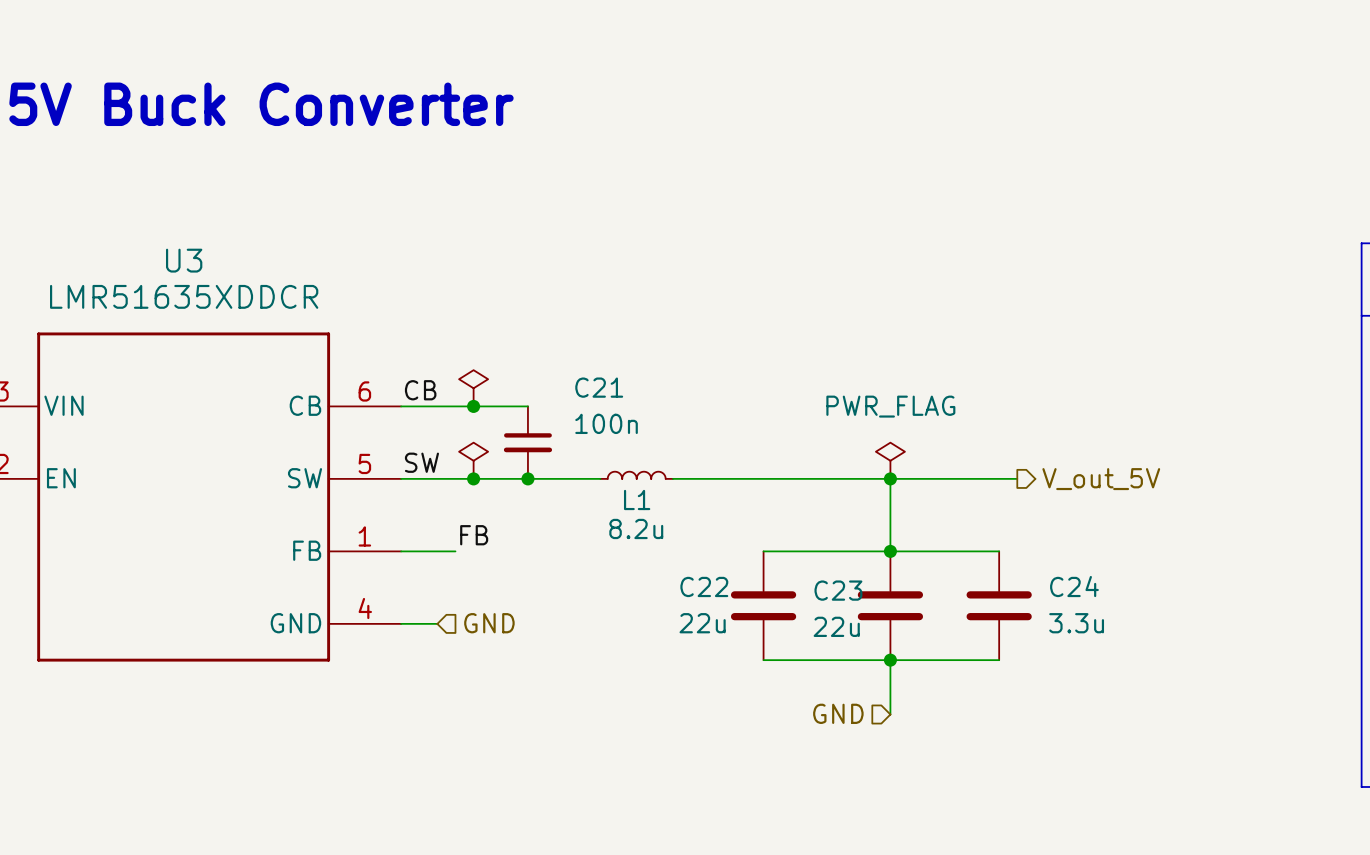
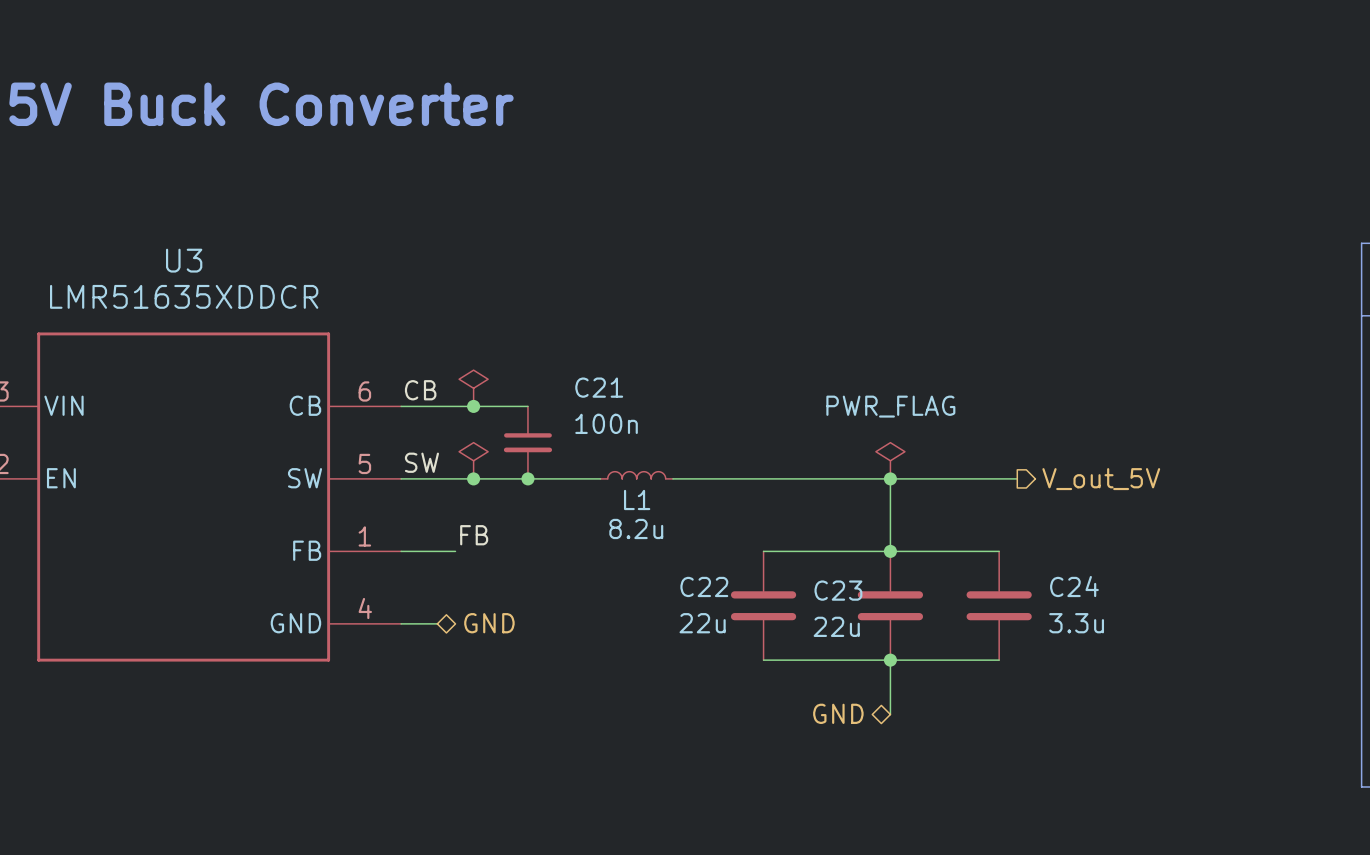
hierarchical label shape: input (489, 623) -> bidirectional (489, 623)
hierarchical label shape: input (838, 713) -> bidirectional (838, 713)

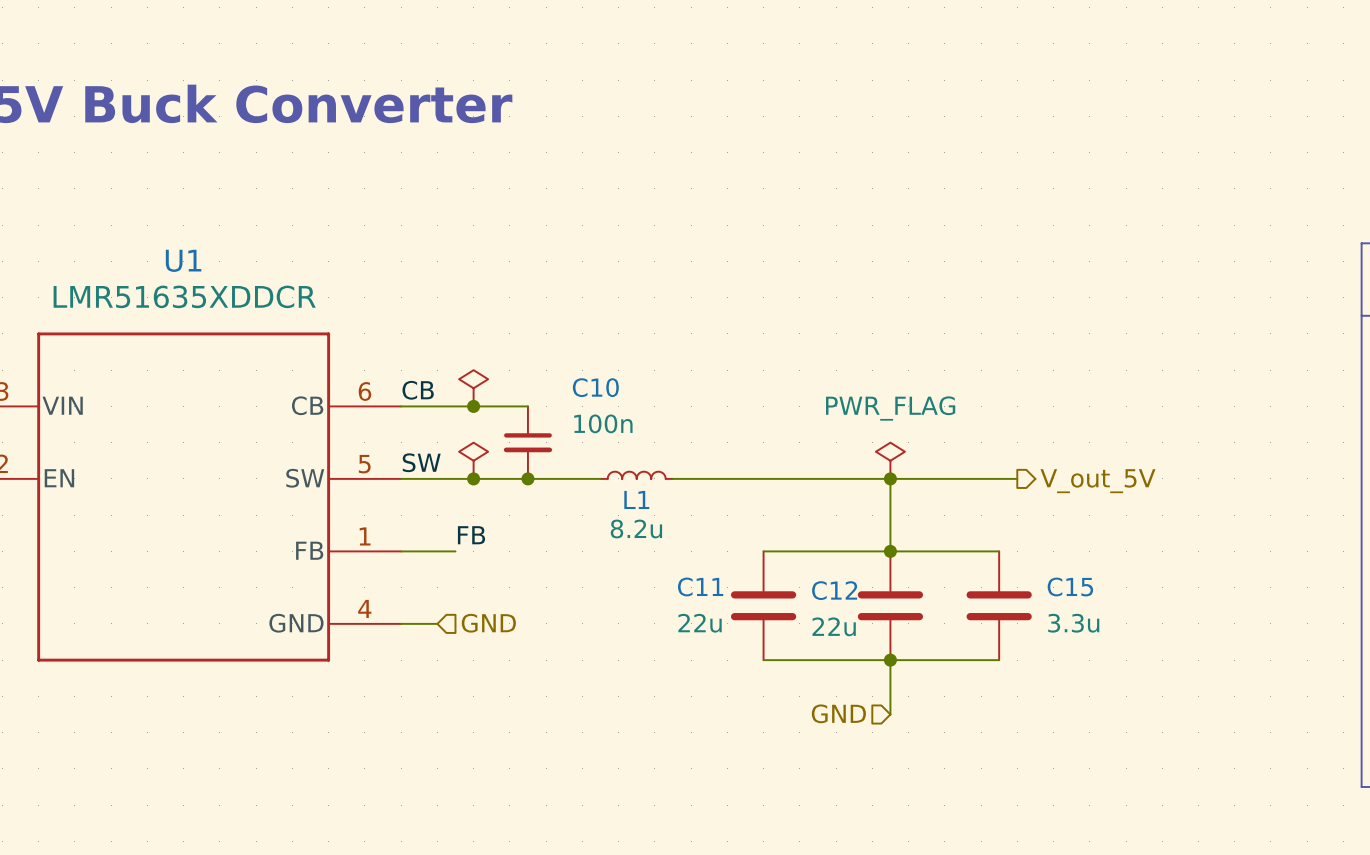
U3 name: U3 (184, 260) -> U1 (183, 260)
C21 name: C21 (599, 387) -> C10 (595, 387)
C22 name: C22 (704, 586) -> C11 (700, 586)
C24 name: C24 (1074, 586) -> C15 (1070, 586)
C23 name: C23 (838, 590) -> C12 (834, 590)
hierarchical label shape: bidirectional (489, 623) -> input (488, 623)
hierarchical label shape: bidirectional (838, 713) -> input (838, 713)

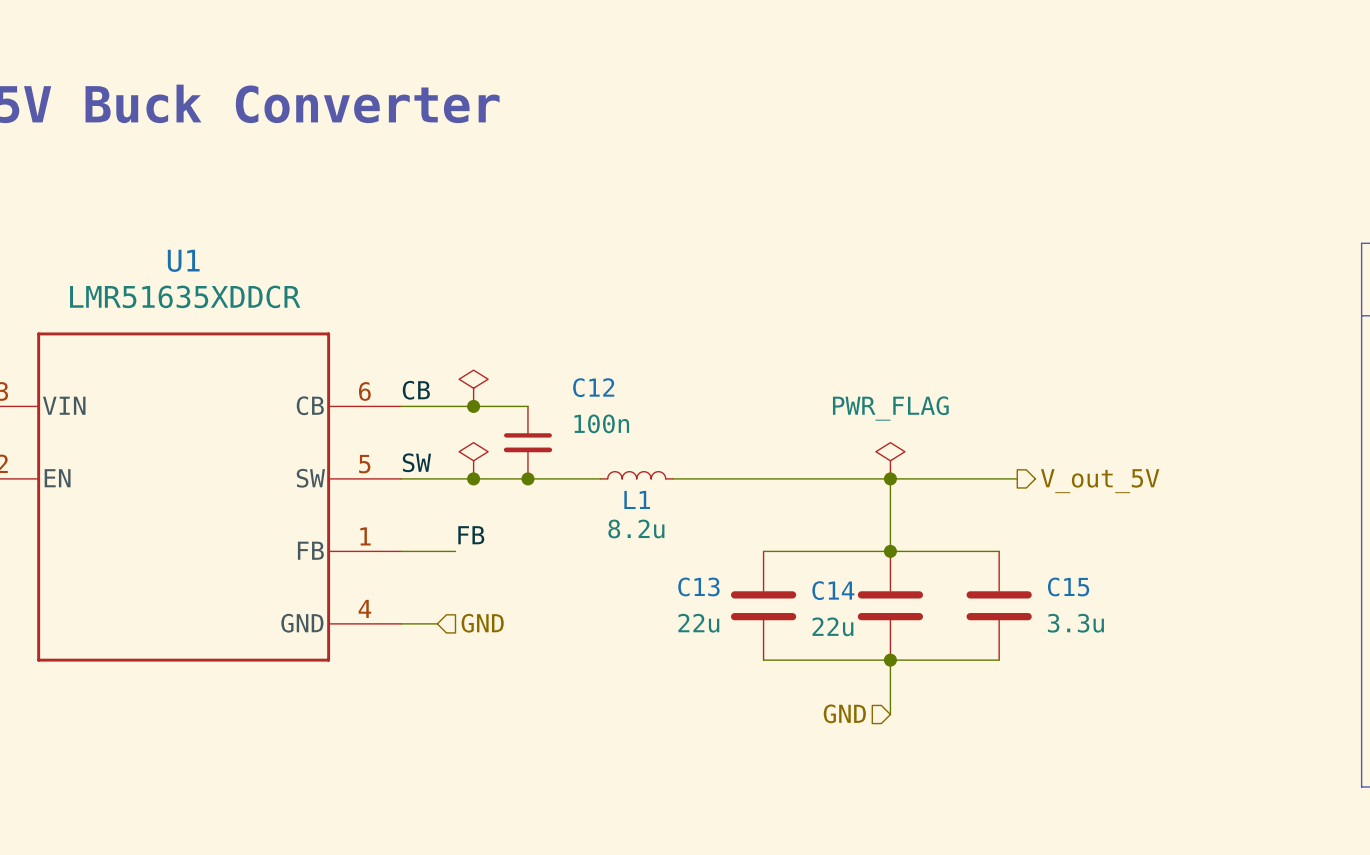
C10 name: C10 (595, 387) -> C12 (593, 387)
C11 name: C11 (700, 586) -> C13 (698, 586)
C12 name: C12 (834, 590) -> C14 (833, 590)

